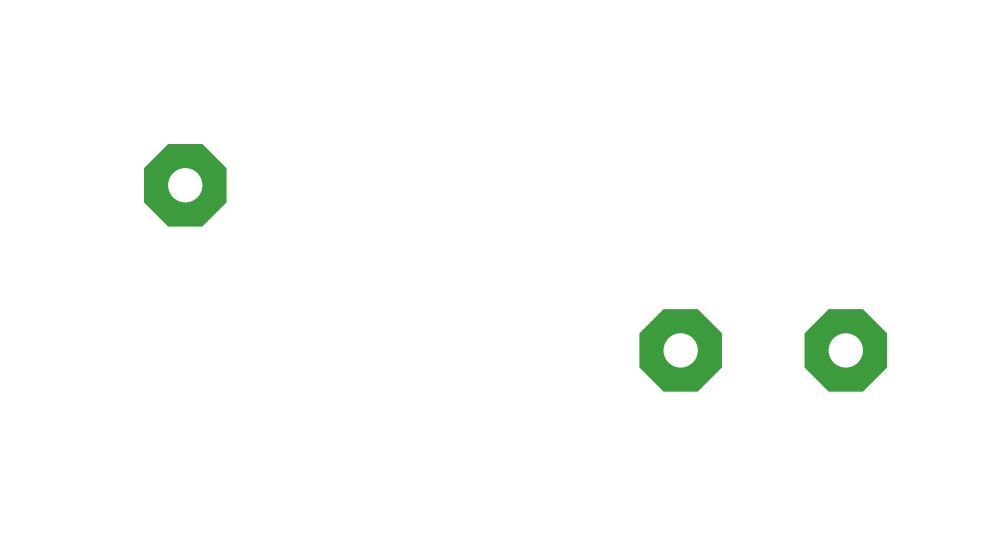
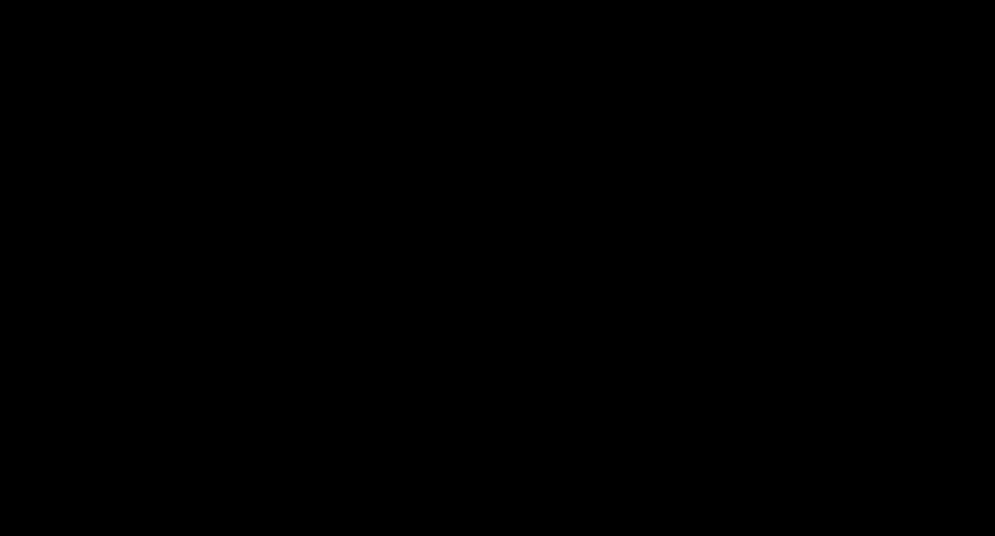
part: (185, 185) -> none
part: (680, 350) -> none
part: (845, 350) -> none

